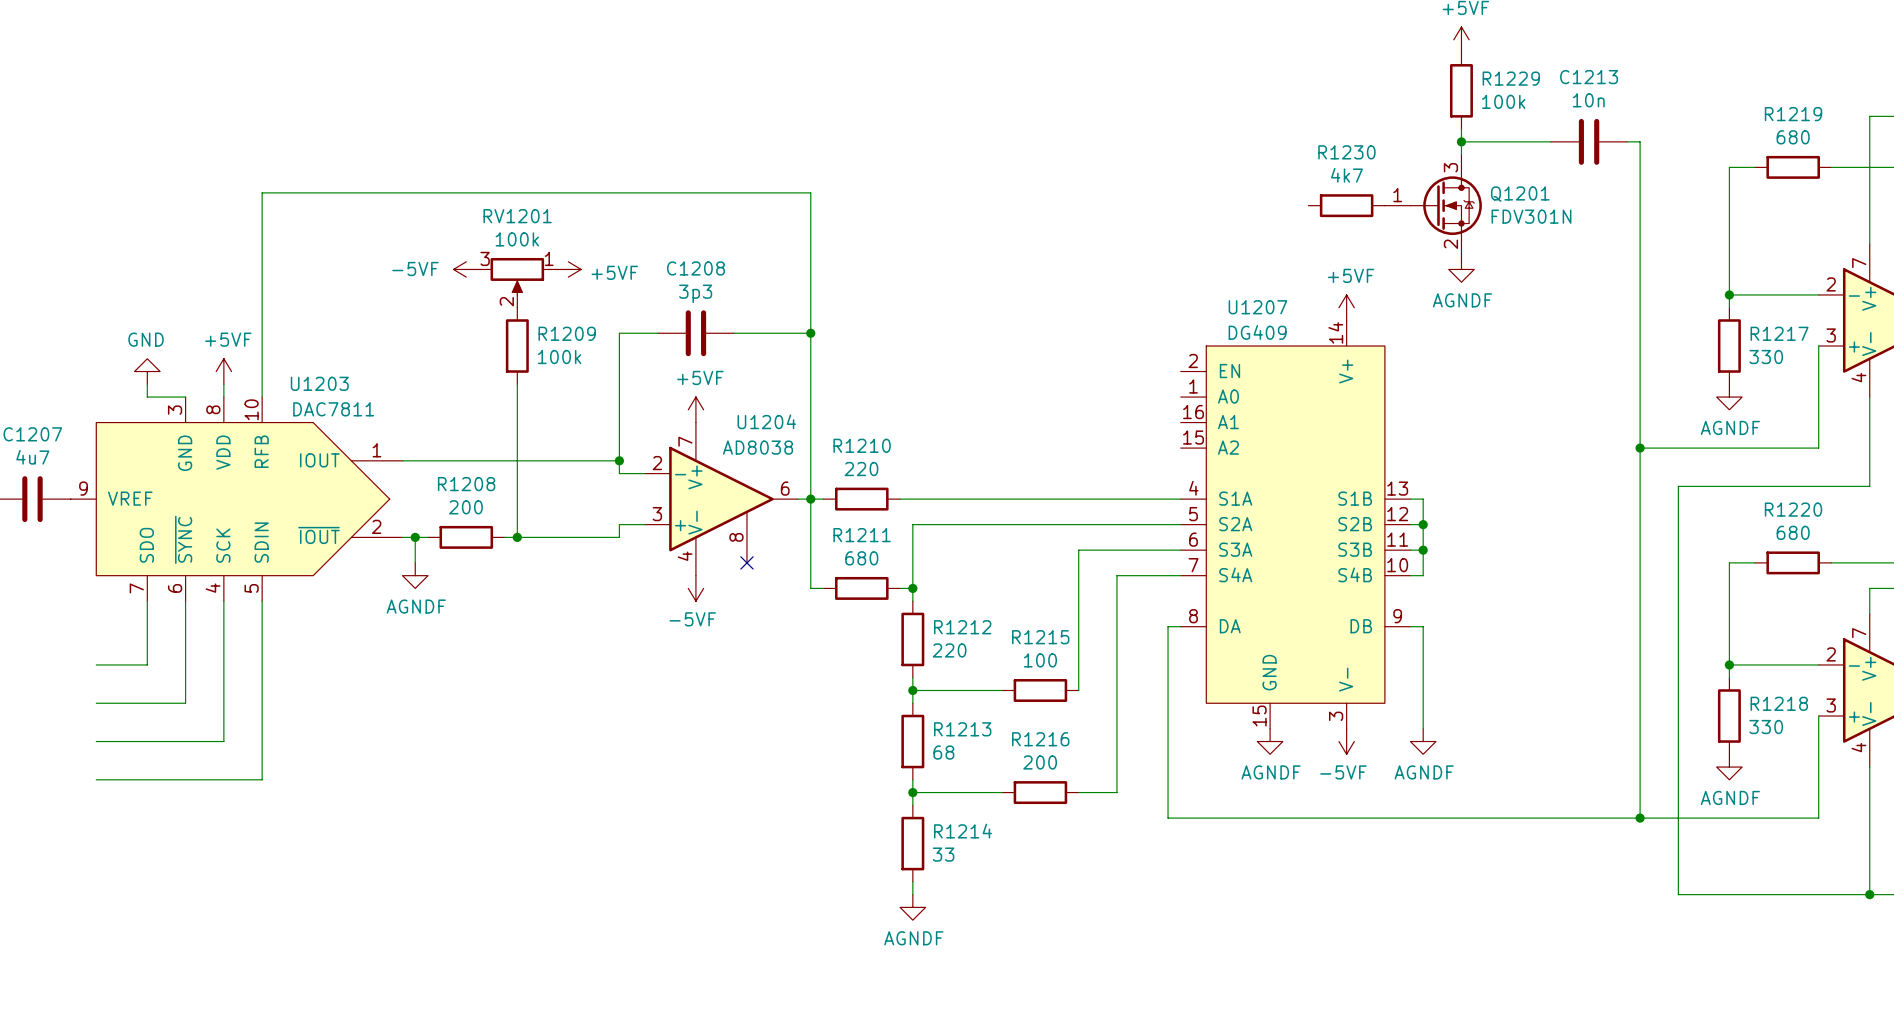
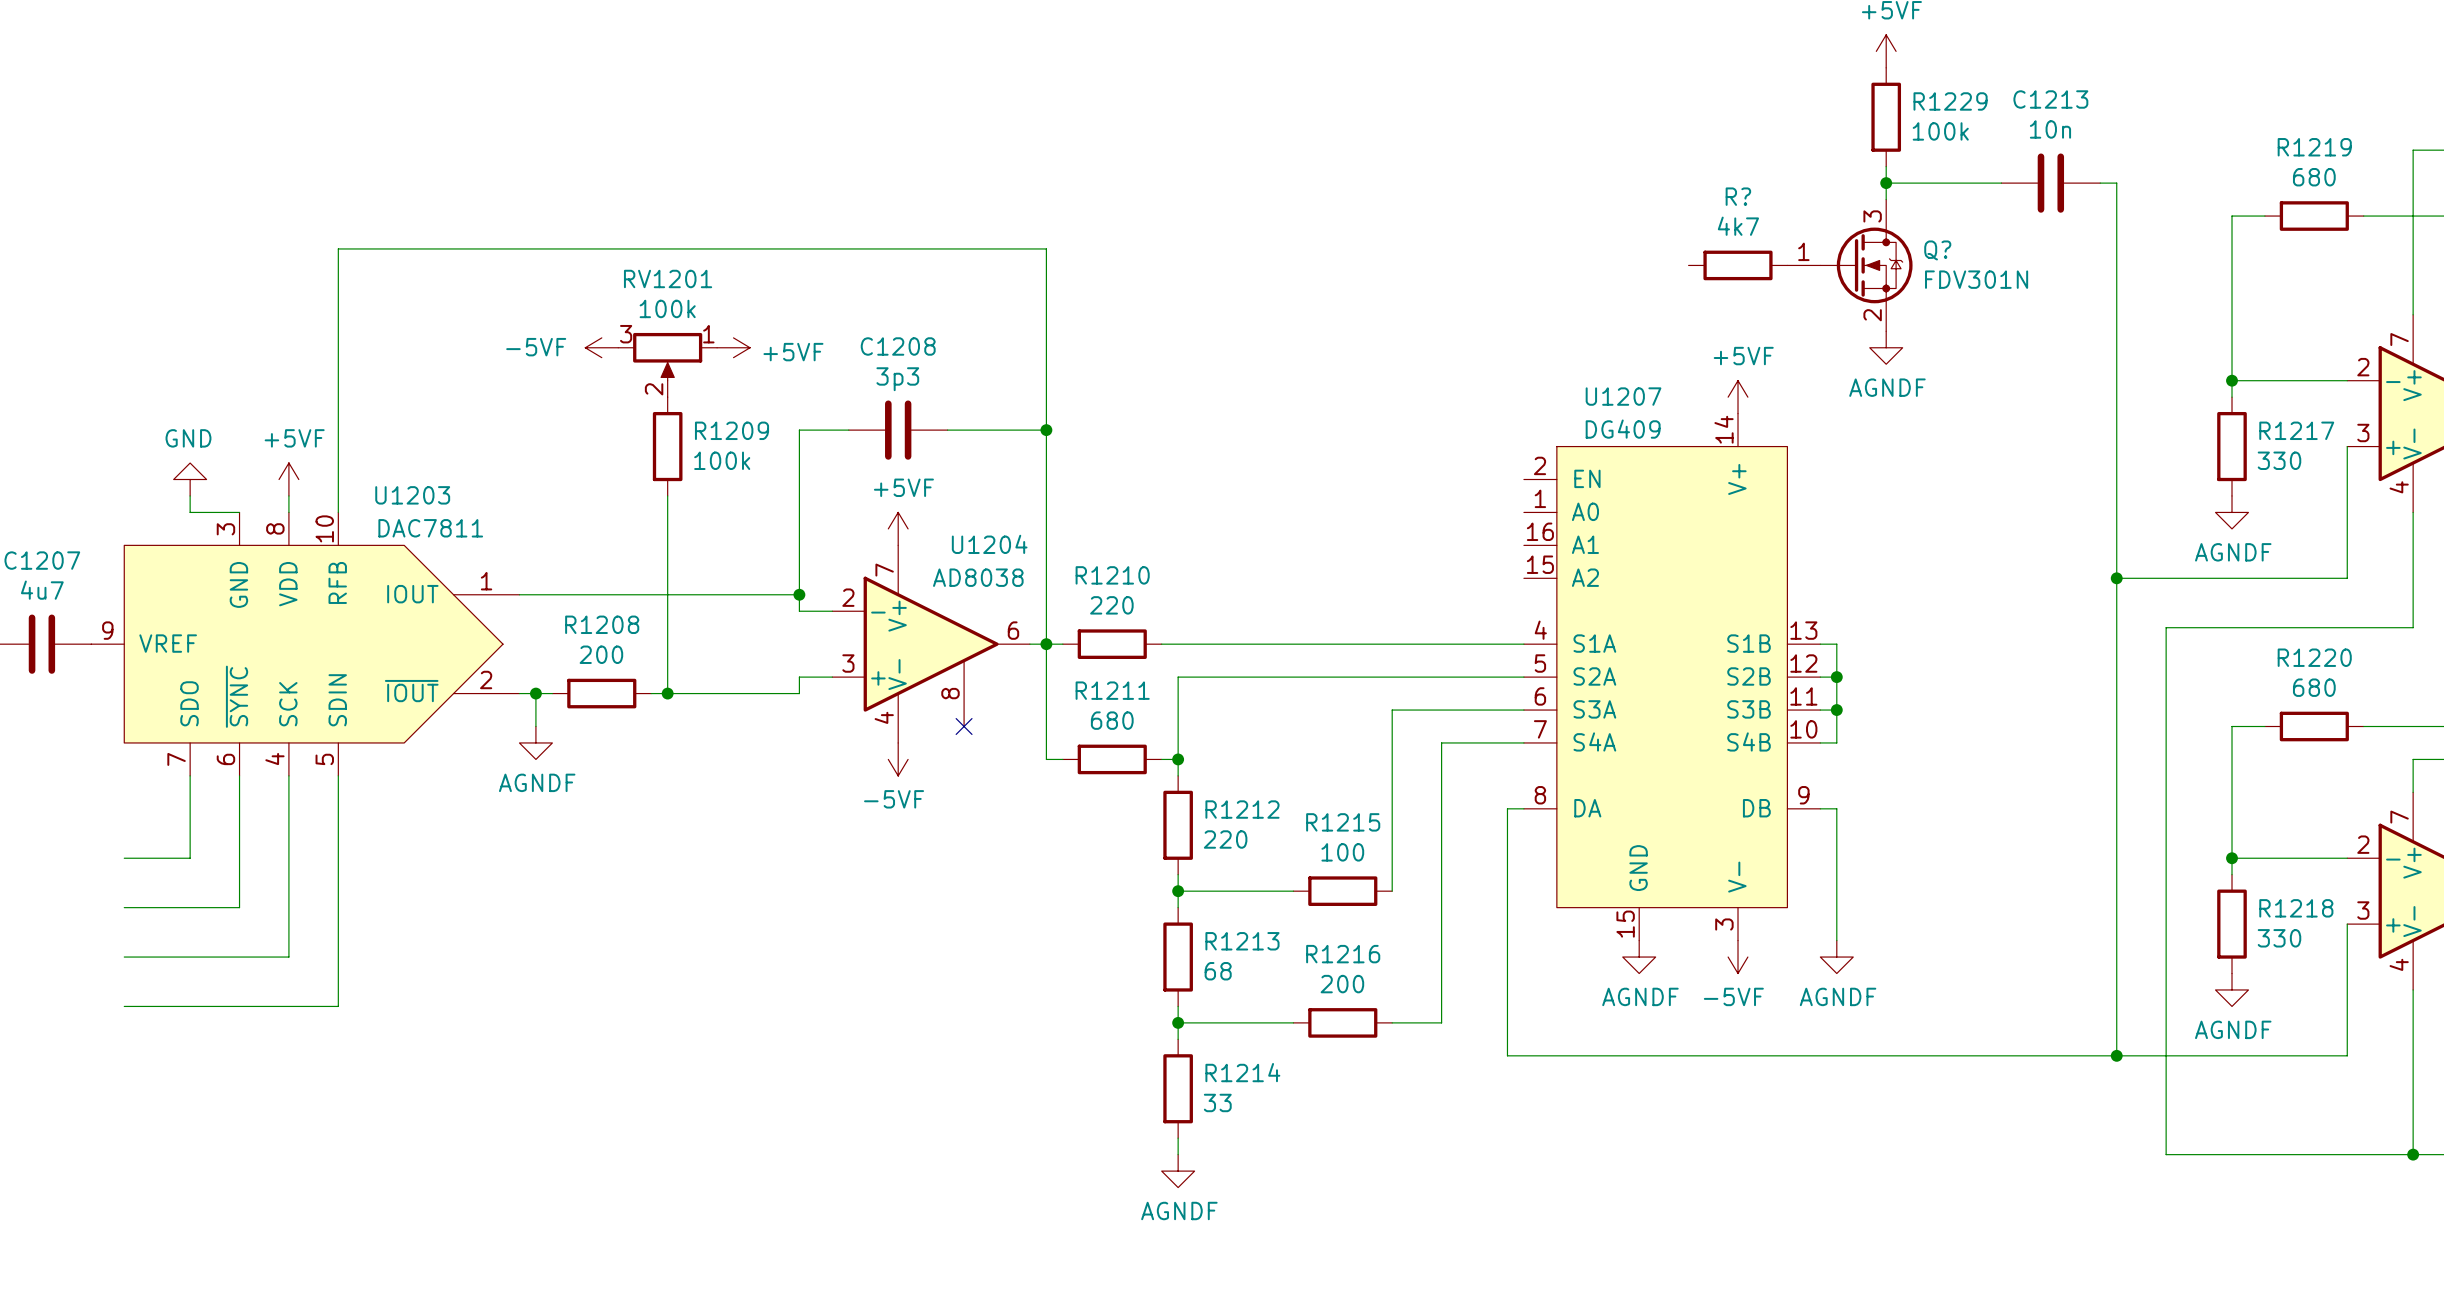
R1230 name: R1230 (1346, 152) -> R? (1738, 196)
Q1201 name: Q1201 (1520, 194) -> Q? (1937, 250)

